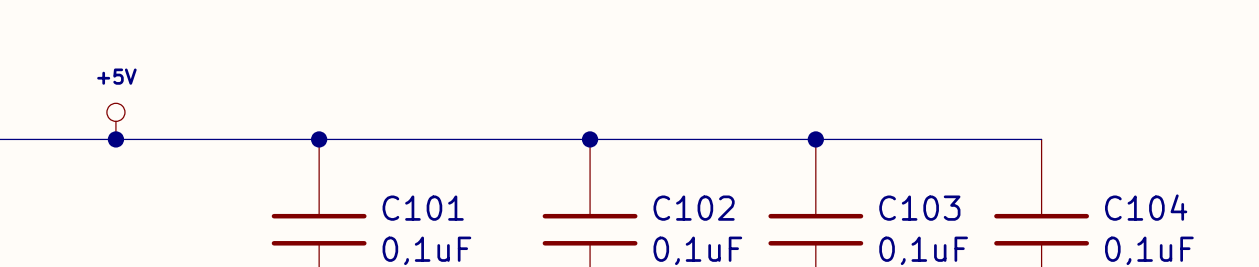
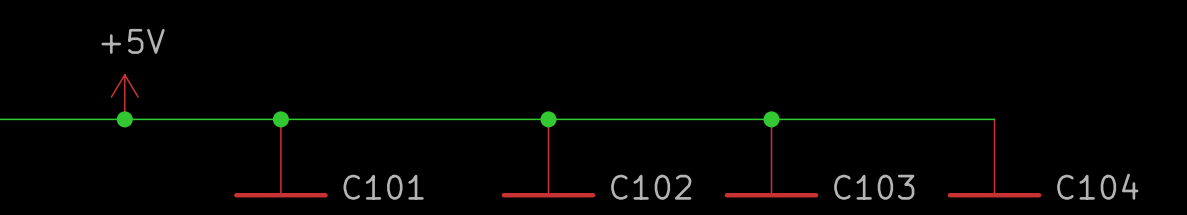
power symbol: none -> +5V (124, 97)
power symbol: +5V (115, 121) -> none
junction position: (115, 139) -> (124, 119)

